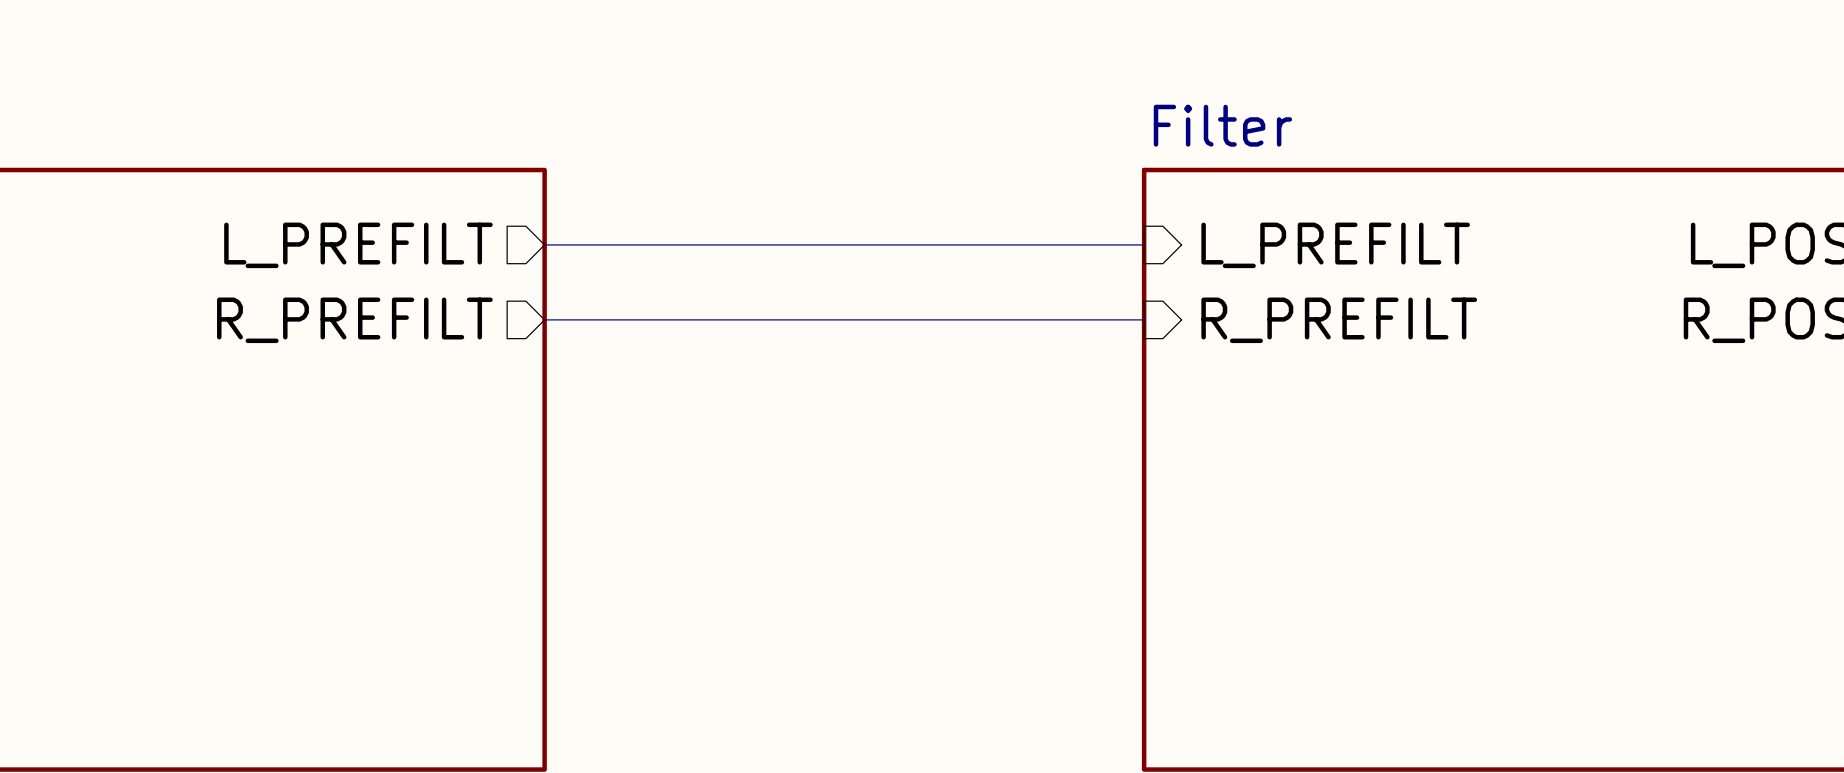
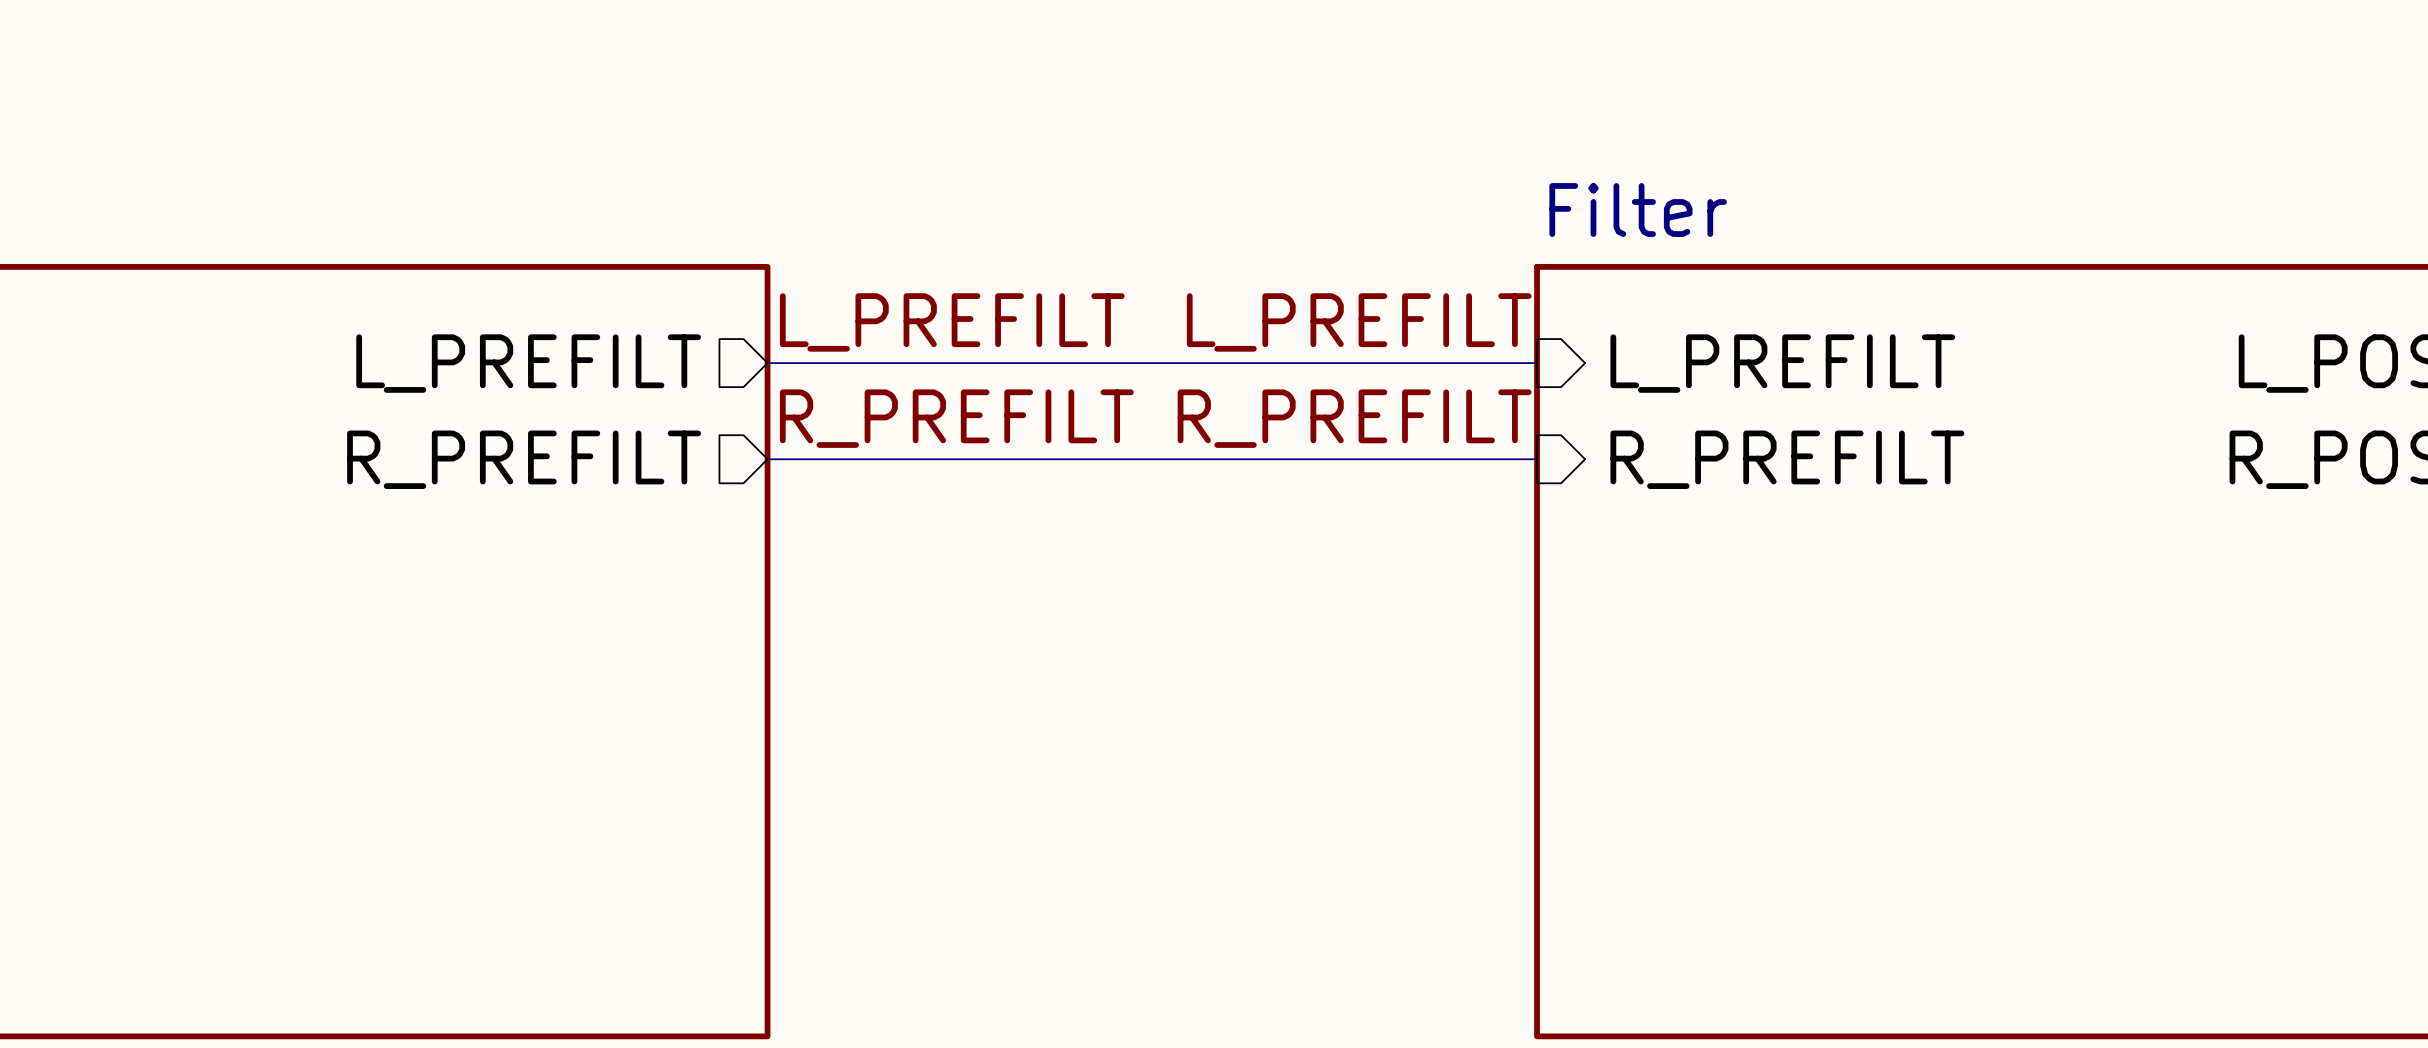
label: none -> L_PREFILT (952, 322)
label: none -> L_PREFILT (1359, 322)
label: none -> R_PREFILT (956, 418)
label: none -> R_PREFILT (1354, 418)

